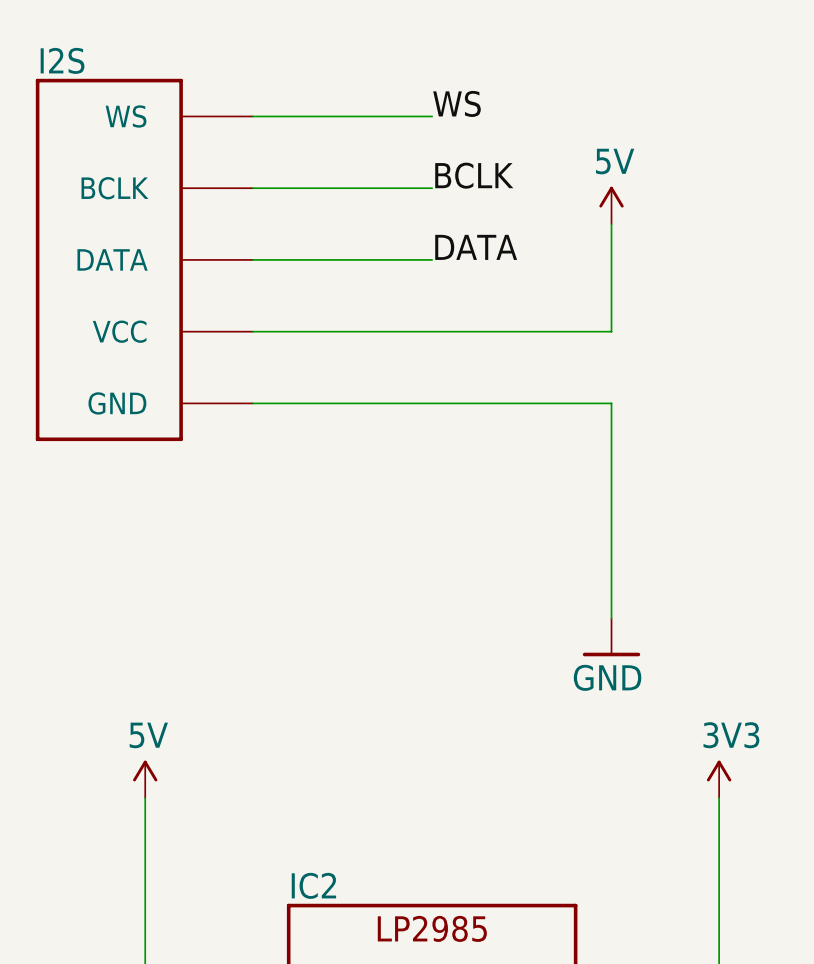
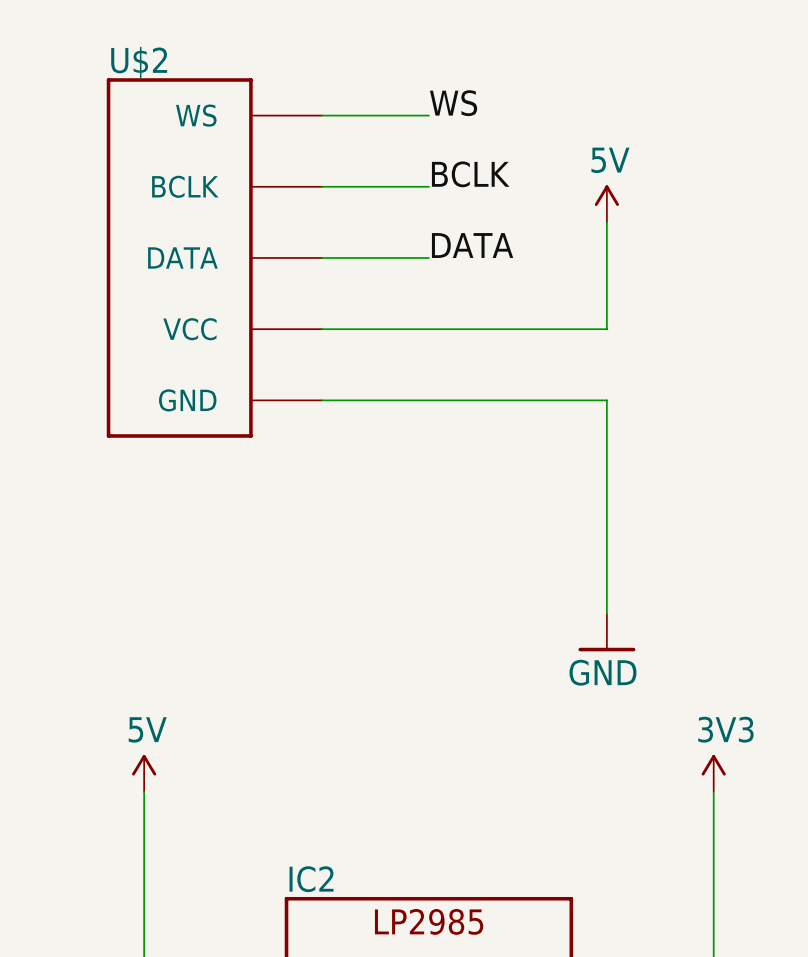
I2S: (144, 259) -> none
U$2: none -> (214, 257)

